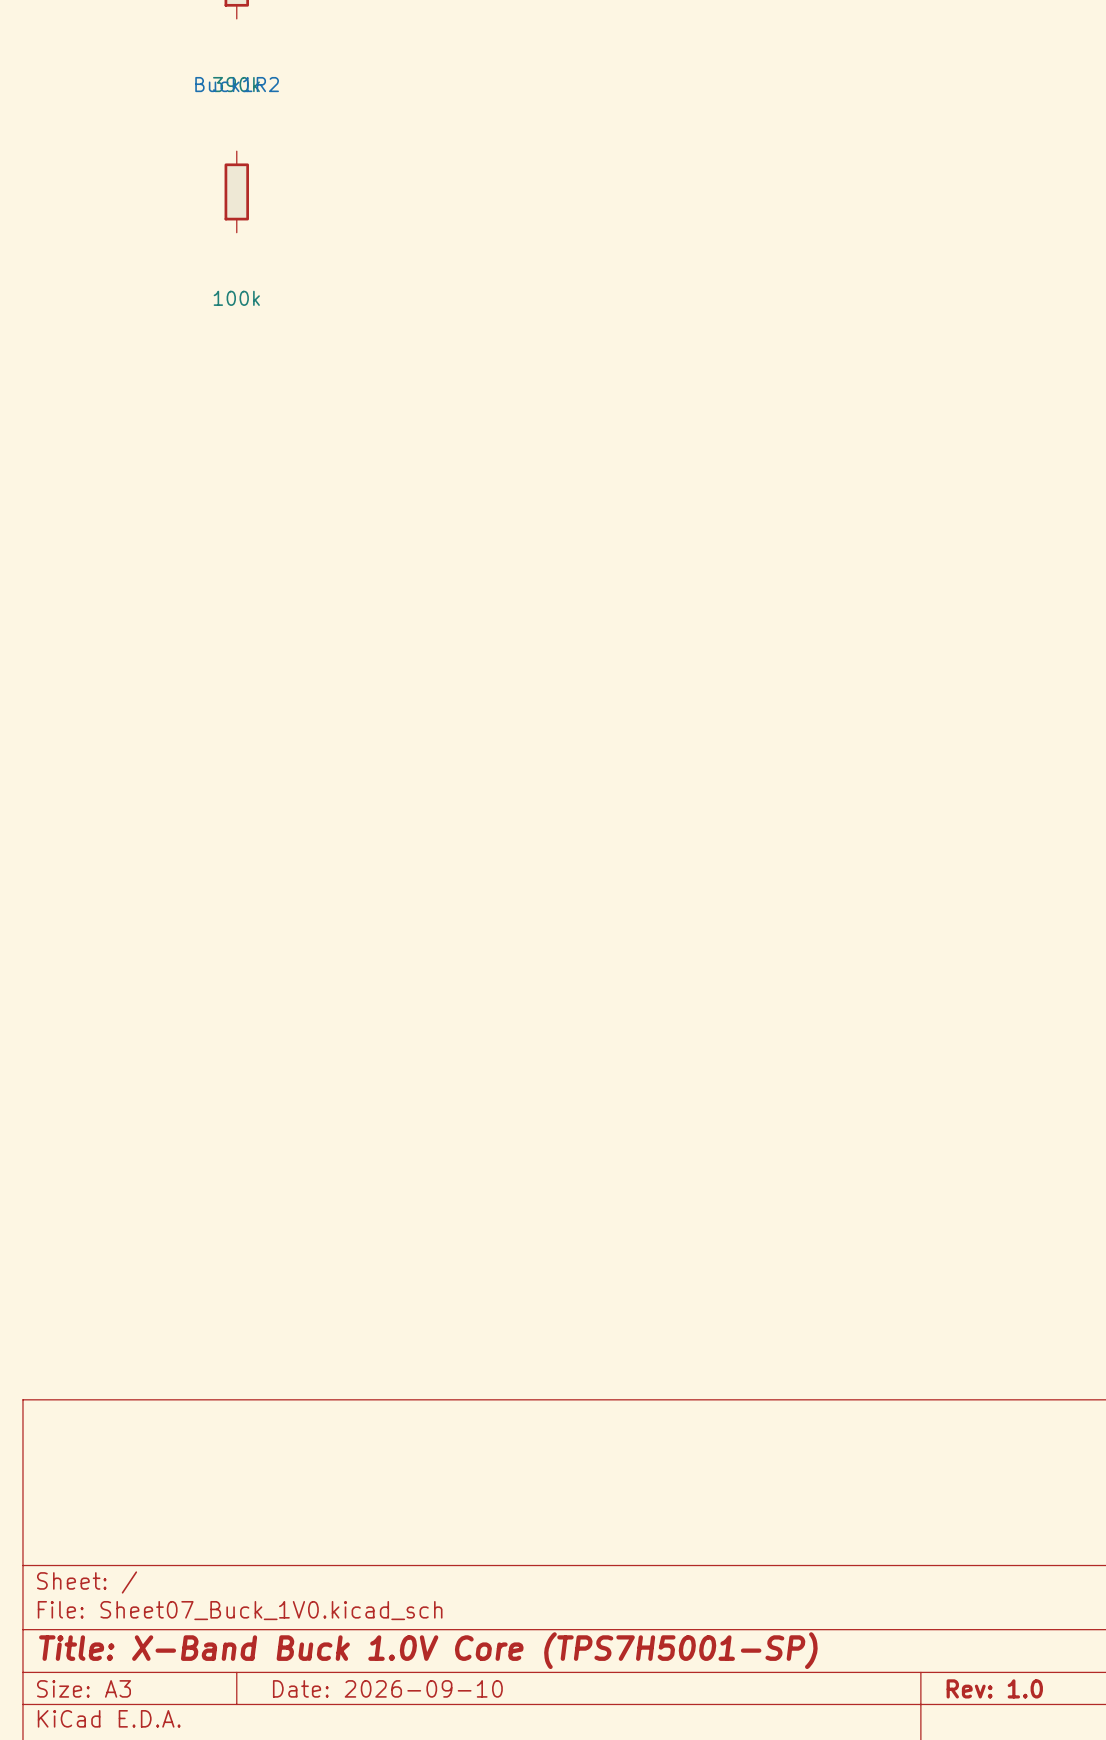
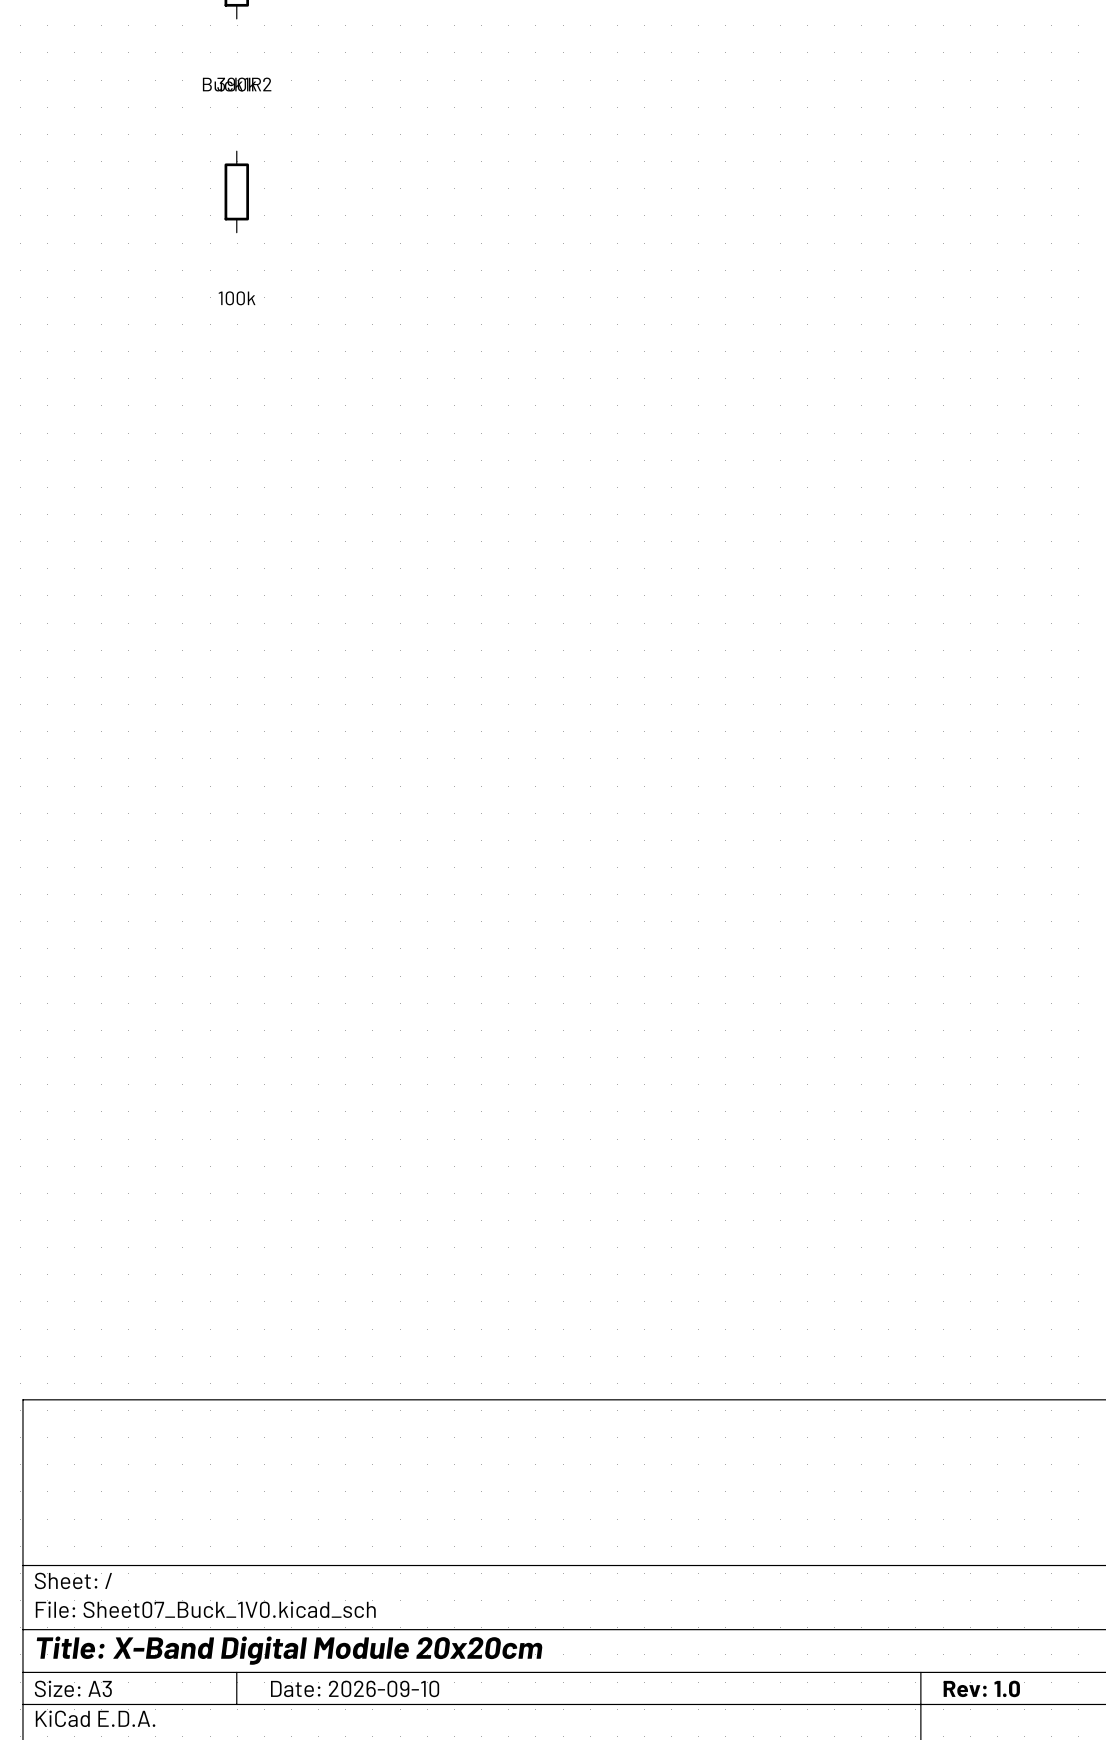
title block: Title: X-Band Buck 1.0V Core (TPS7H5001-SP) (428, 1650) -> Title: X-Band Digital Module 20x20cm (289, 1650)

